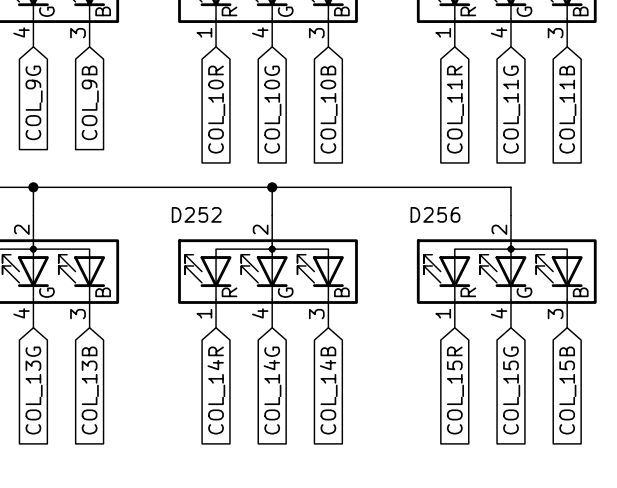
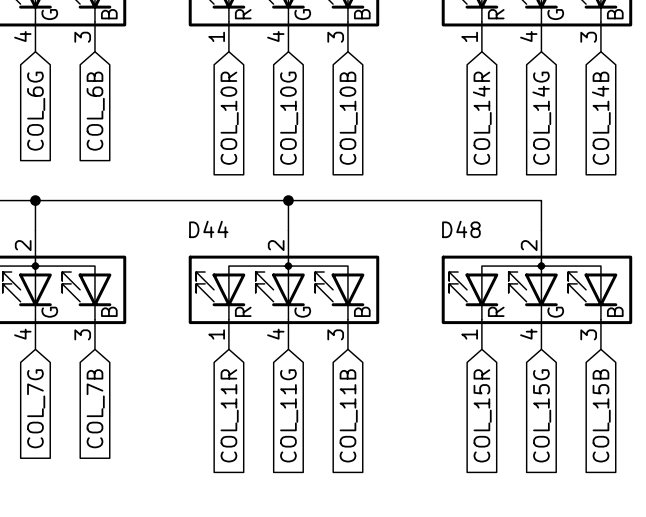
global label: COL_9G (34, 102) -> COL_6G (36, 111)
global label: COL_9B (90, 102) -> COL_6B (95, 111)
global label: COL_11R (455, 109) -> COL_14R (482, 118)
global label: COL_11G (511, 109) -> COL_14G (541, 118)
global label: COL_11B (567, 109) -> COL_14B (601, 118)
D252 name: D252 (196, 214) -> D44 (208, 229)
D256 name: D256 (435, 214) -> D48 (461, 229)
global label: COL_13G (34, 390) -> COL_7G (36, 408)
global label: COL_13B (90, 390) -> COL_7B (95, 408)
global label: COL_14R (216, 390) -> COL_11R (229, 415)
global label: COL_14G (272, 390) -> COL_11G (289, 415)
global label: COL_14B (328, 390) -> COL_11B (348, 415)

